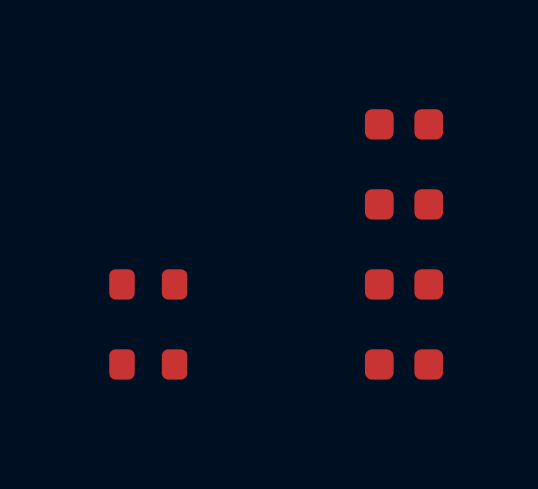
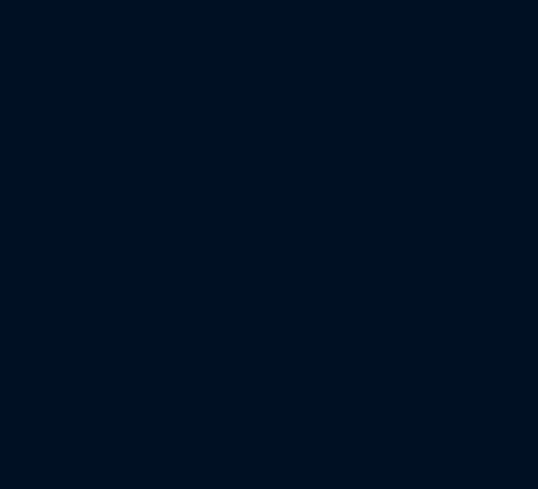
part: (404, 124) -> none
part: (404, 204) -> none
part: (148, 284) -> none
part: (404, 284) -> none
part: (148, 364) -> none
part: (404, 364) -> none

